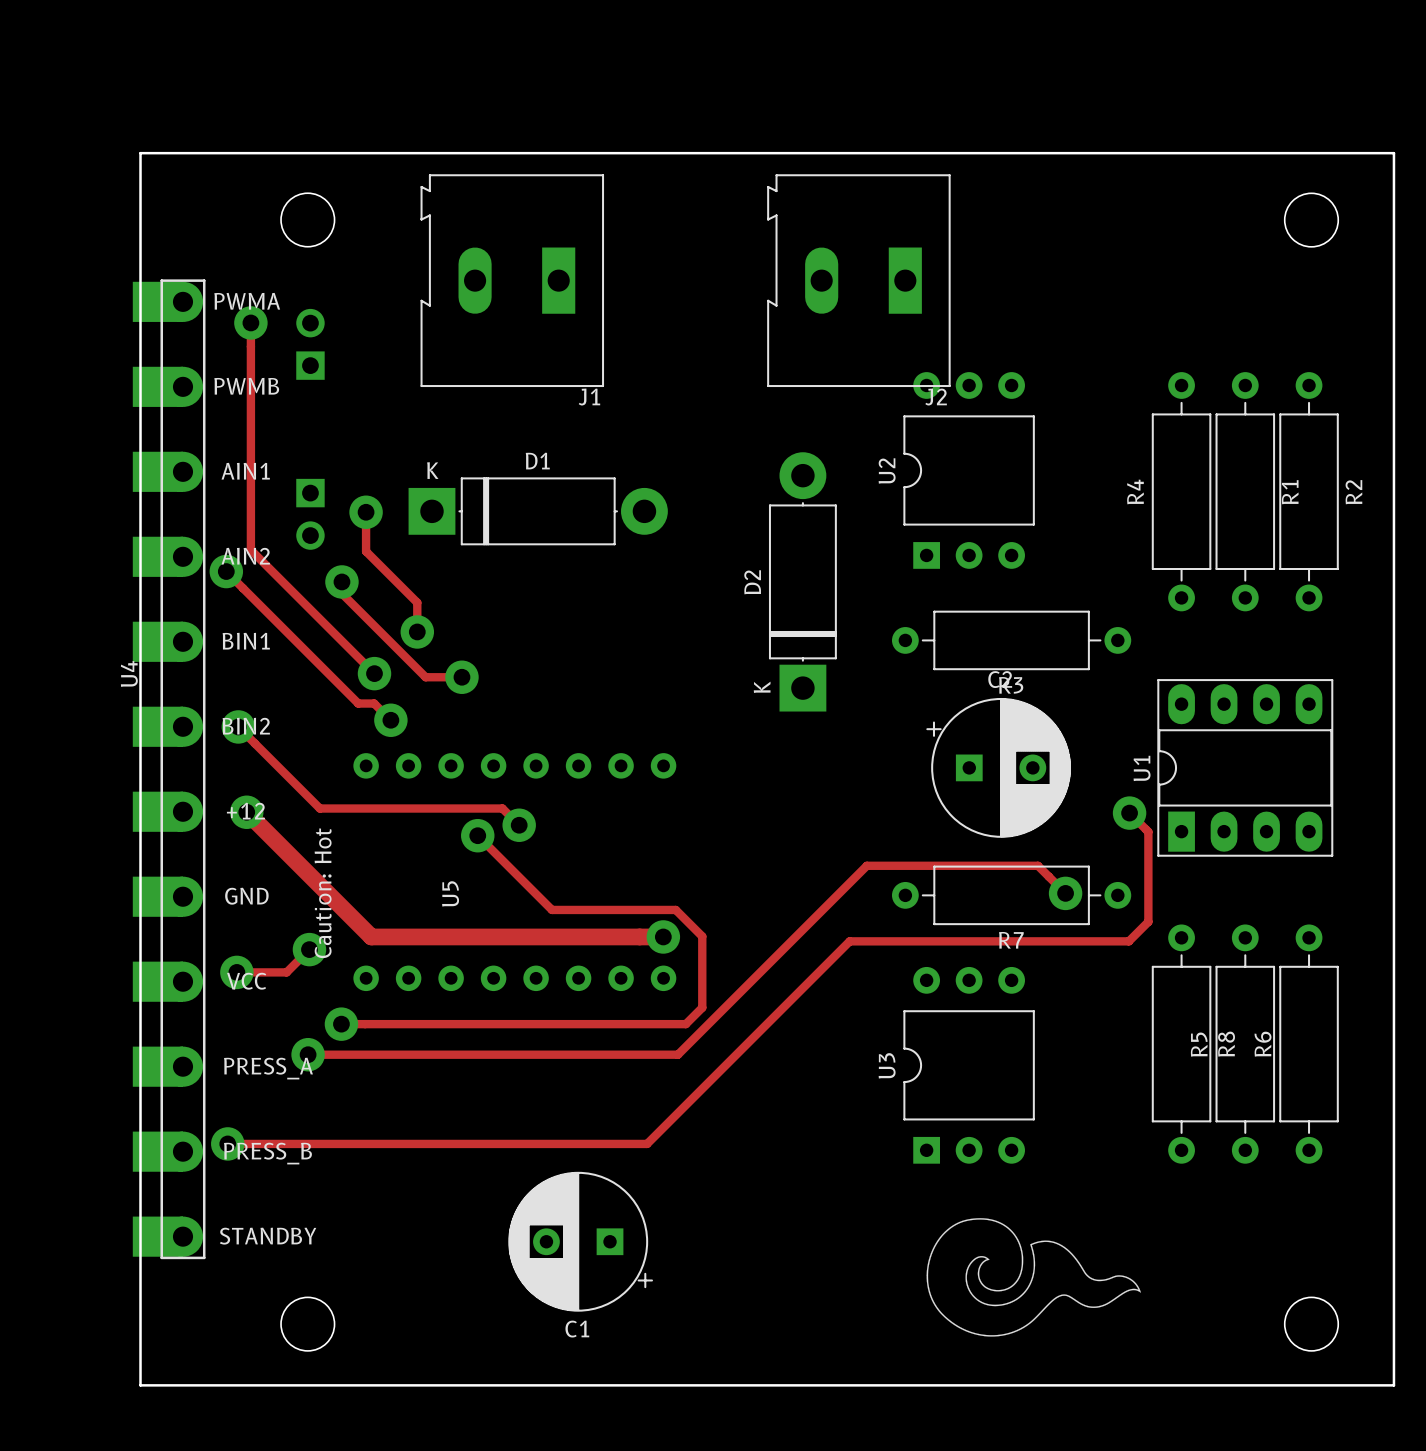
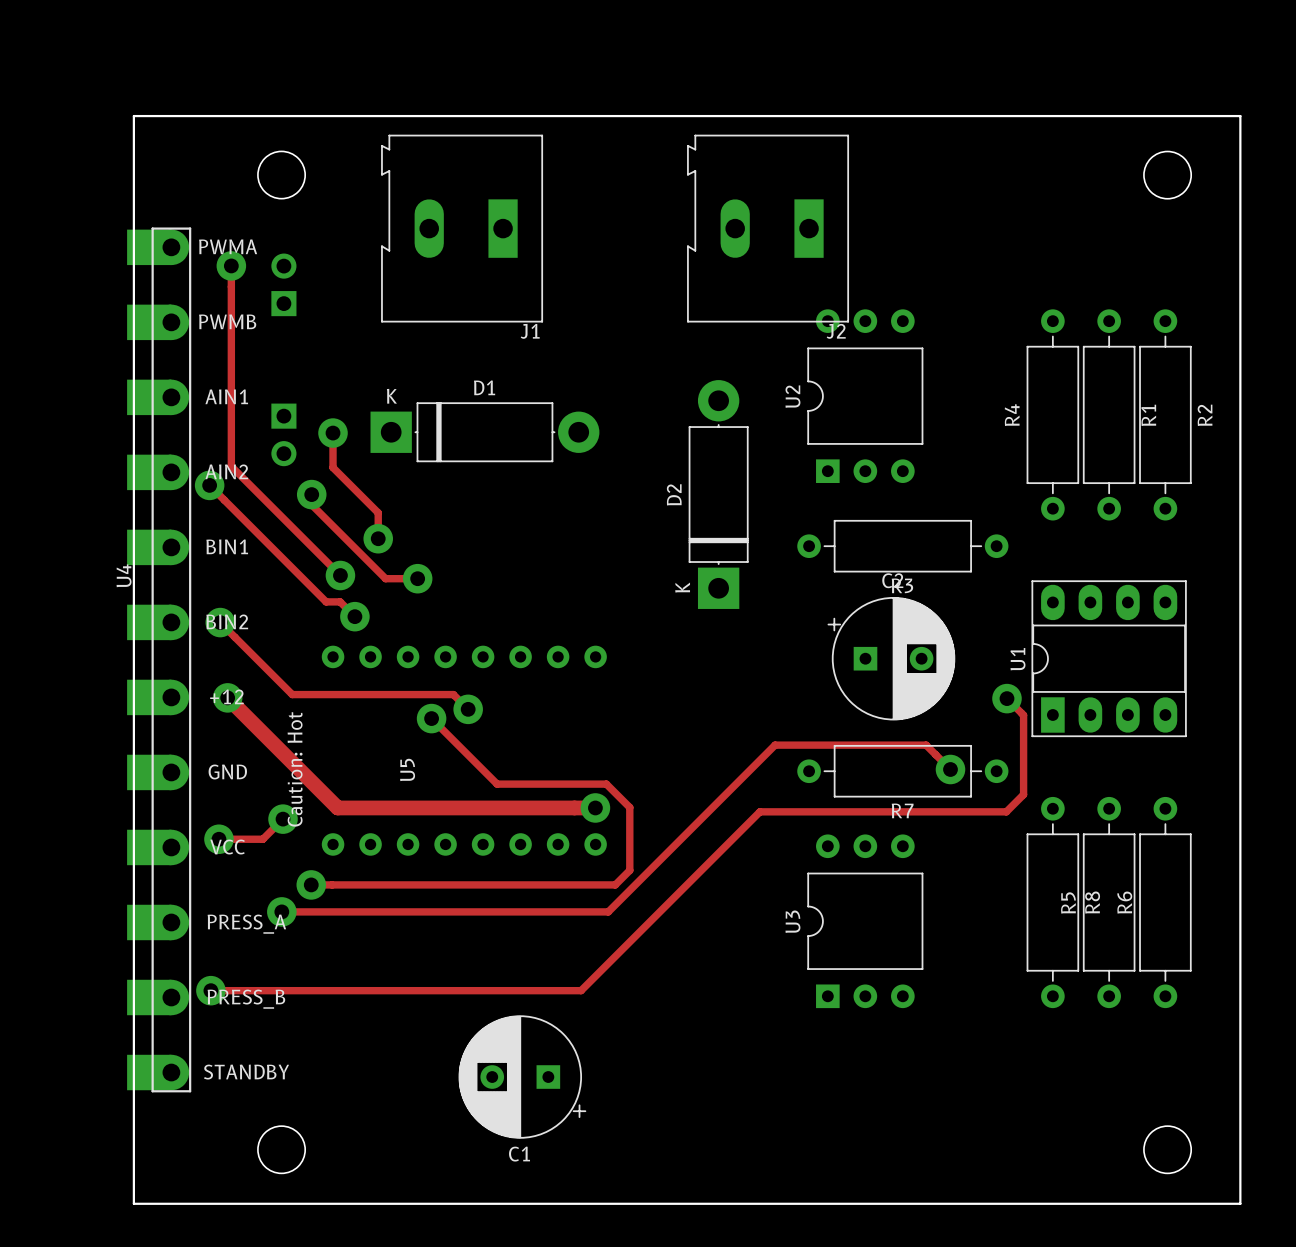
drawing: [926, 1218, 1141, 1337] -> none

